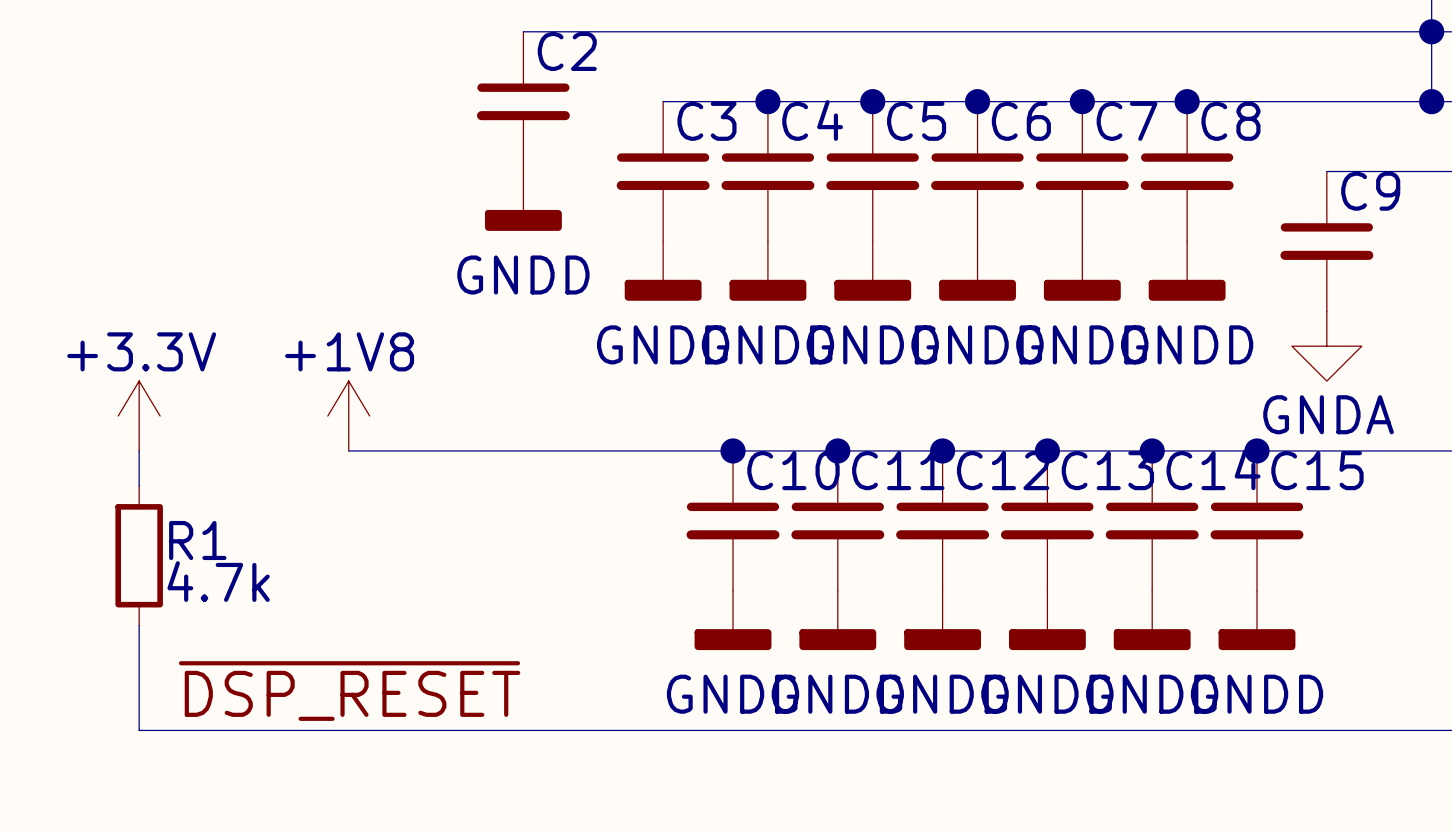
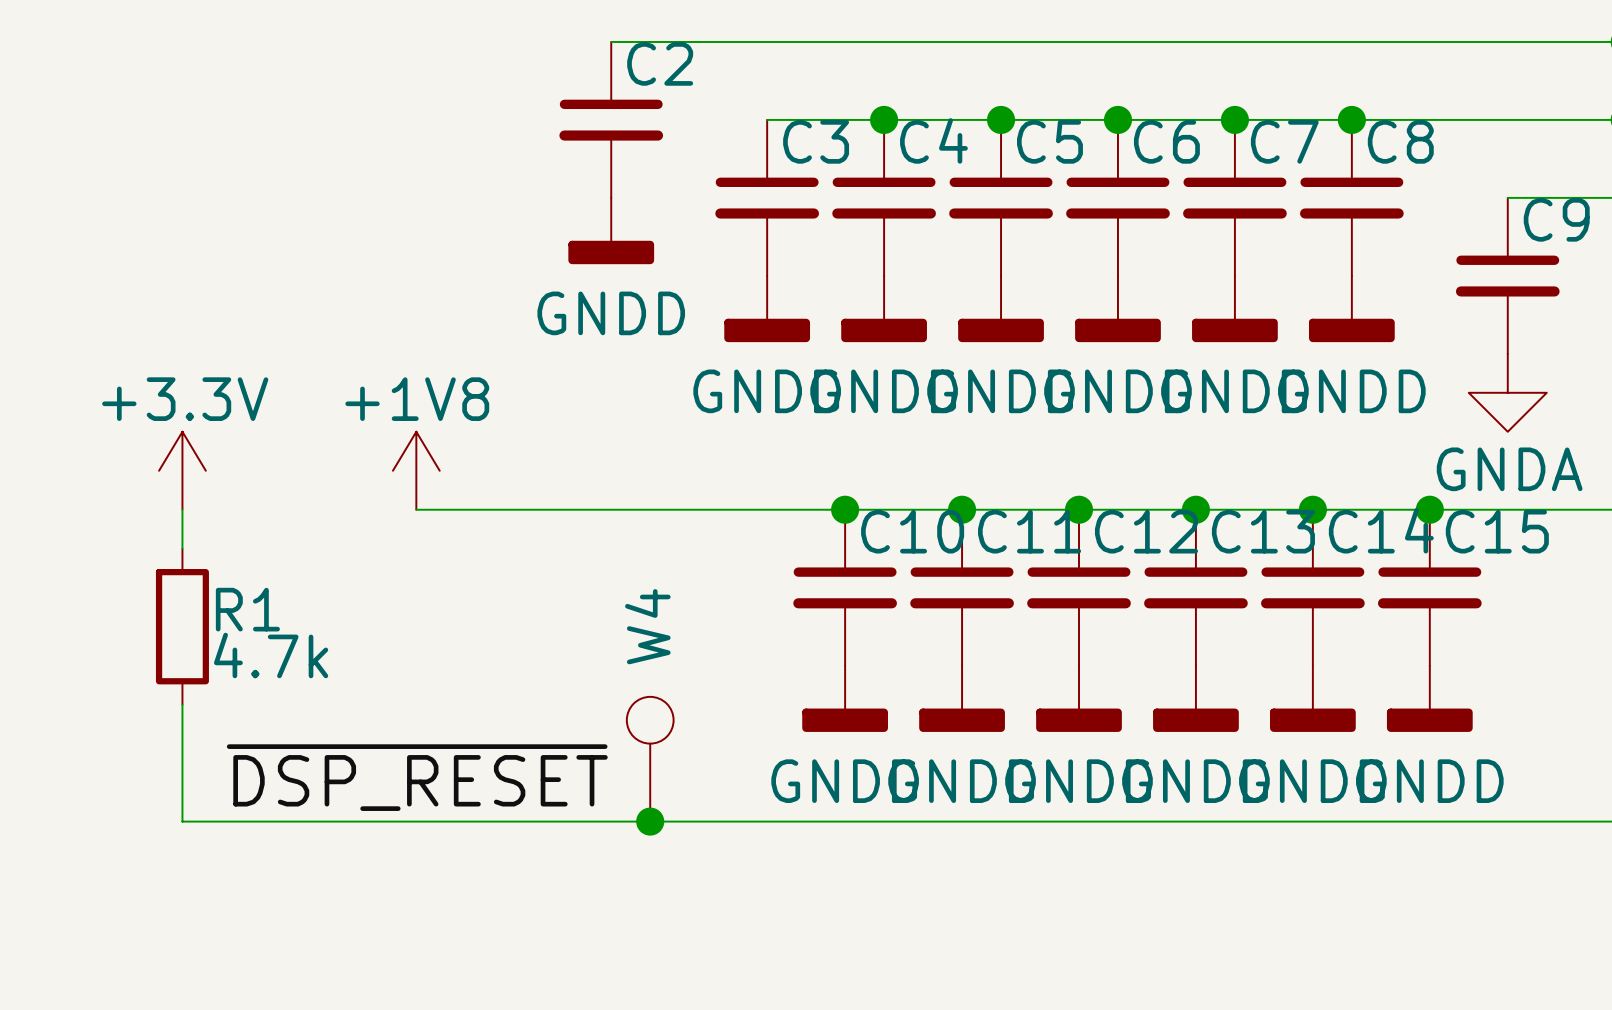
W4: none -> (650, 759)
junction: none -> (650, 821)

